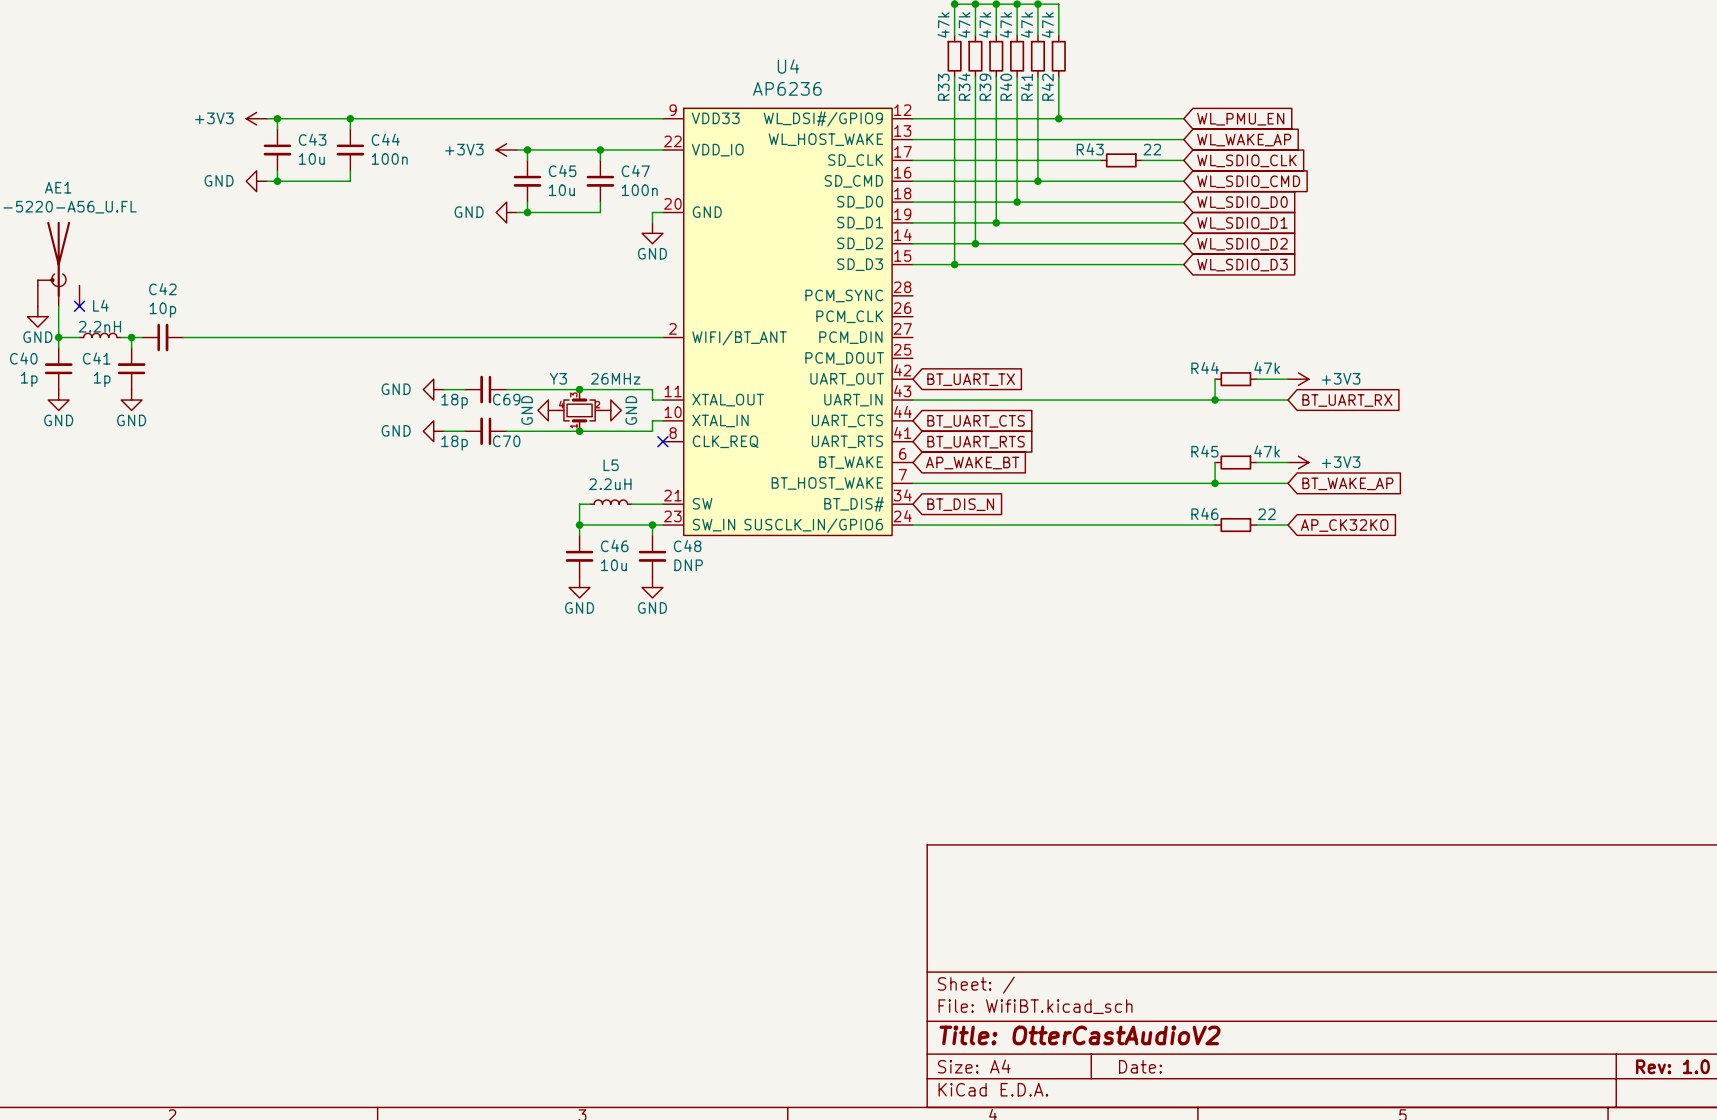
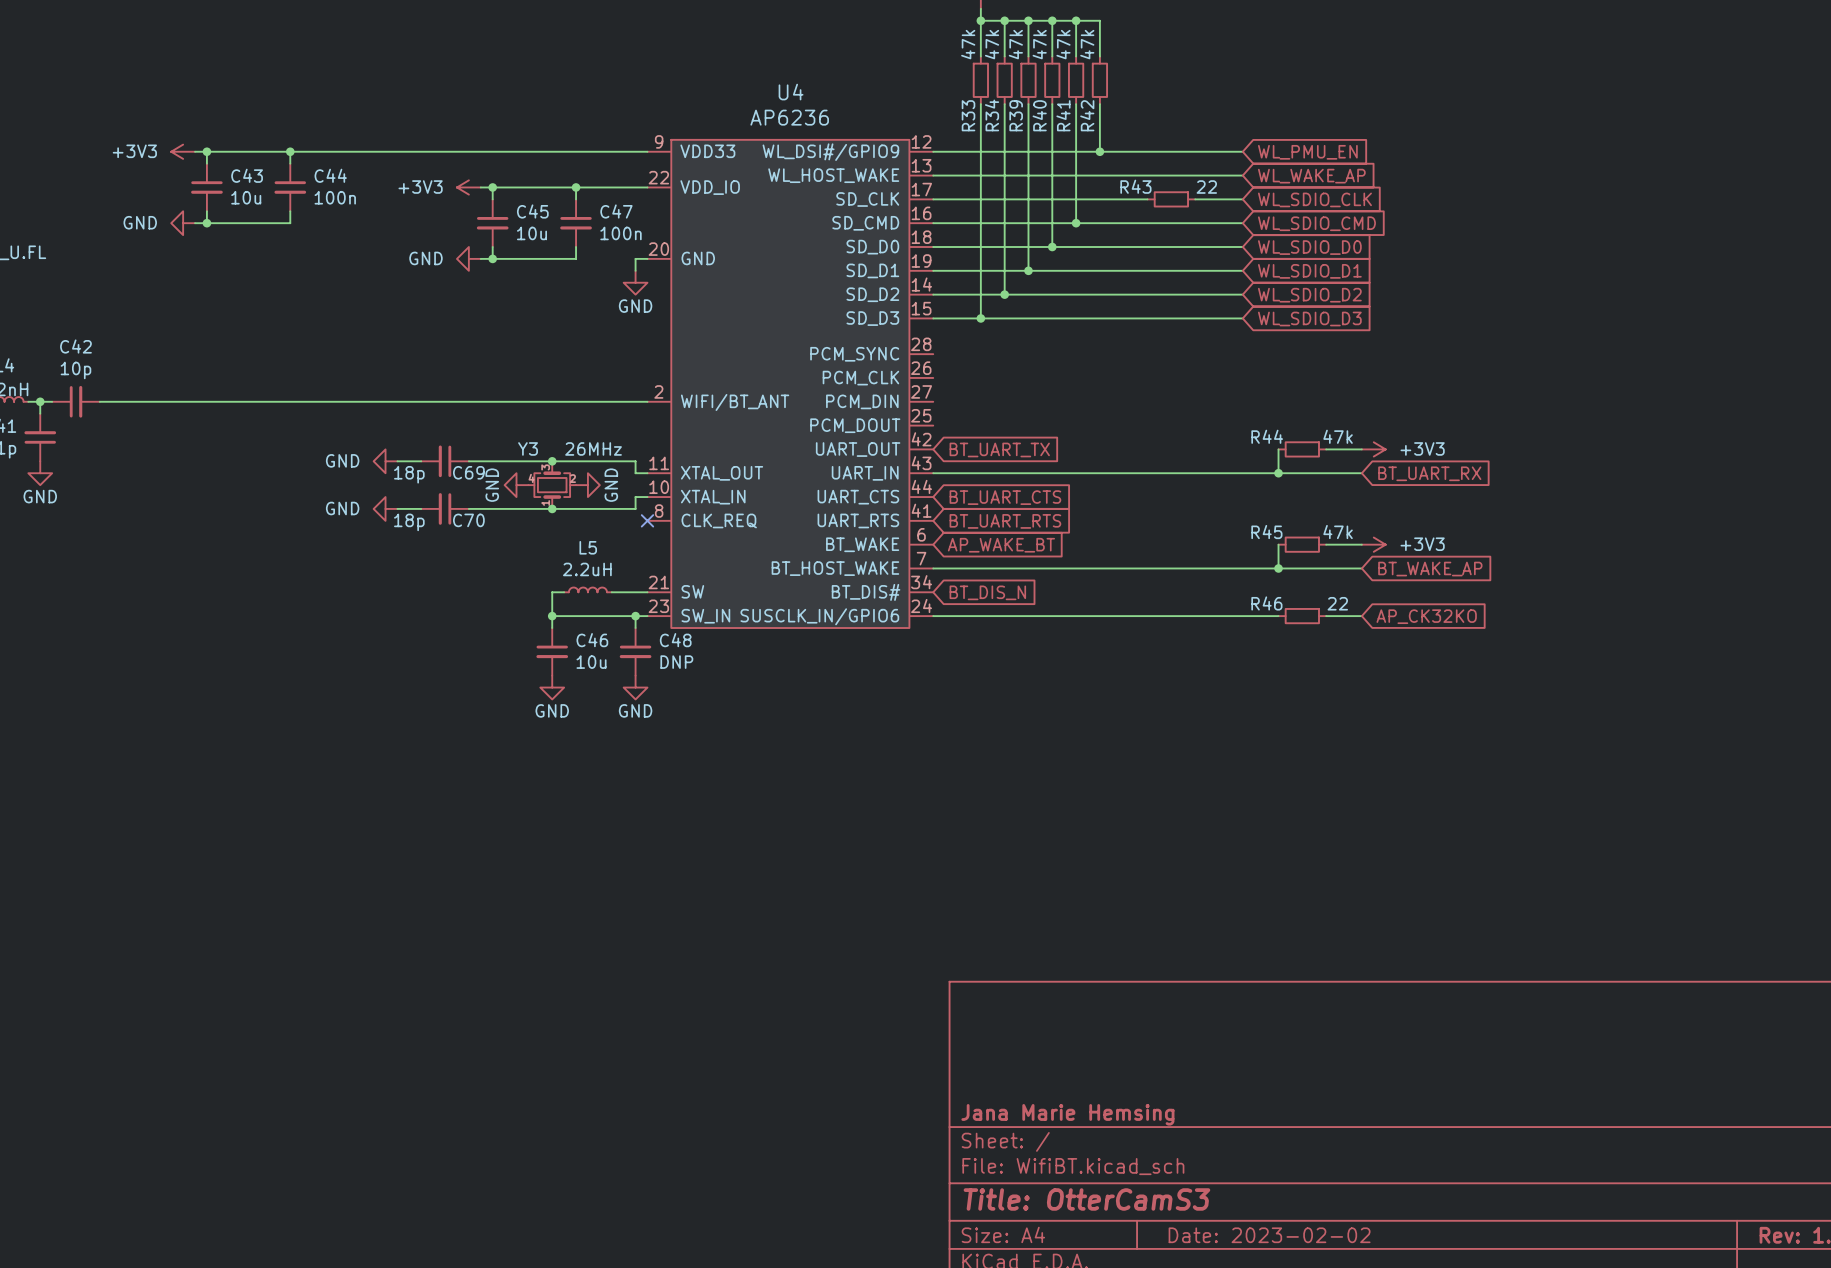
title block: none -> Jana Marie Hemsing (1067, 1114)
title block: Title: OtterCastAudioV2 (1080, 1035) -> Title: OtterCamS3 (1086, 1199)
title block: Date: (1140, 1066) -> Date: 2023-02-02 (1269, 1235)

